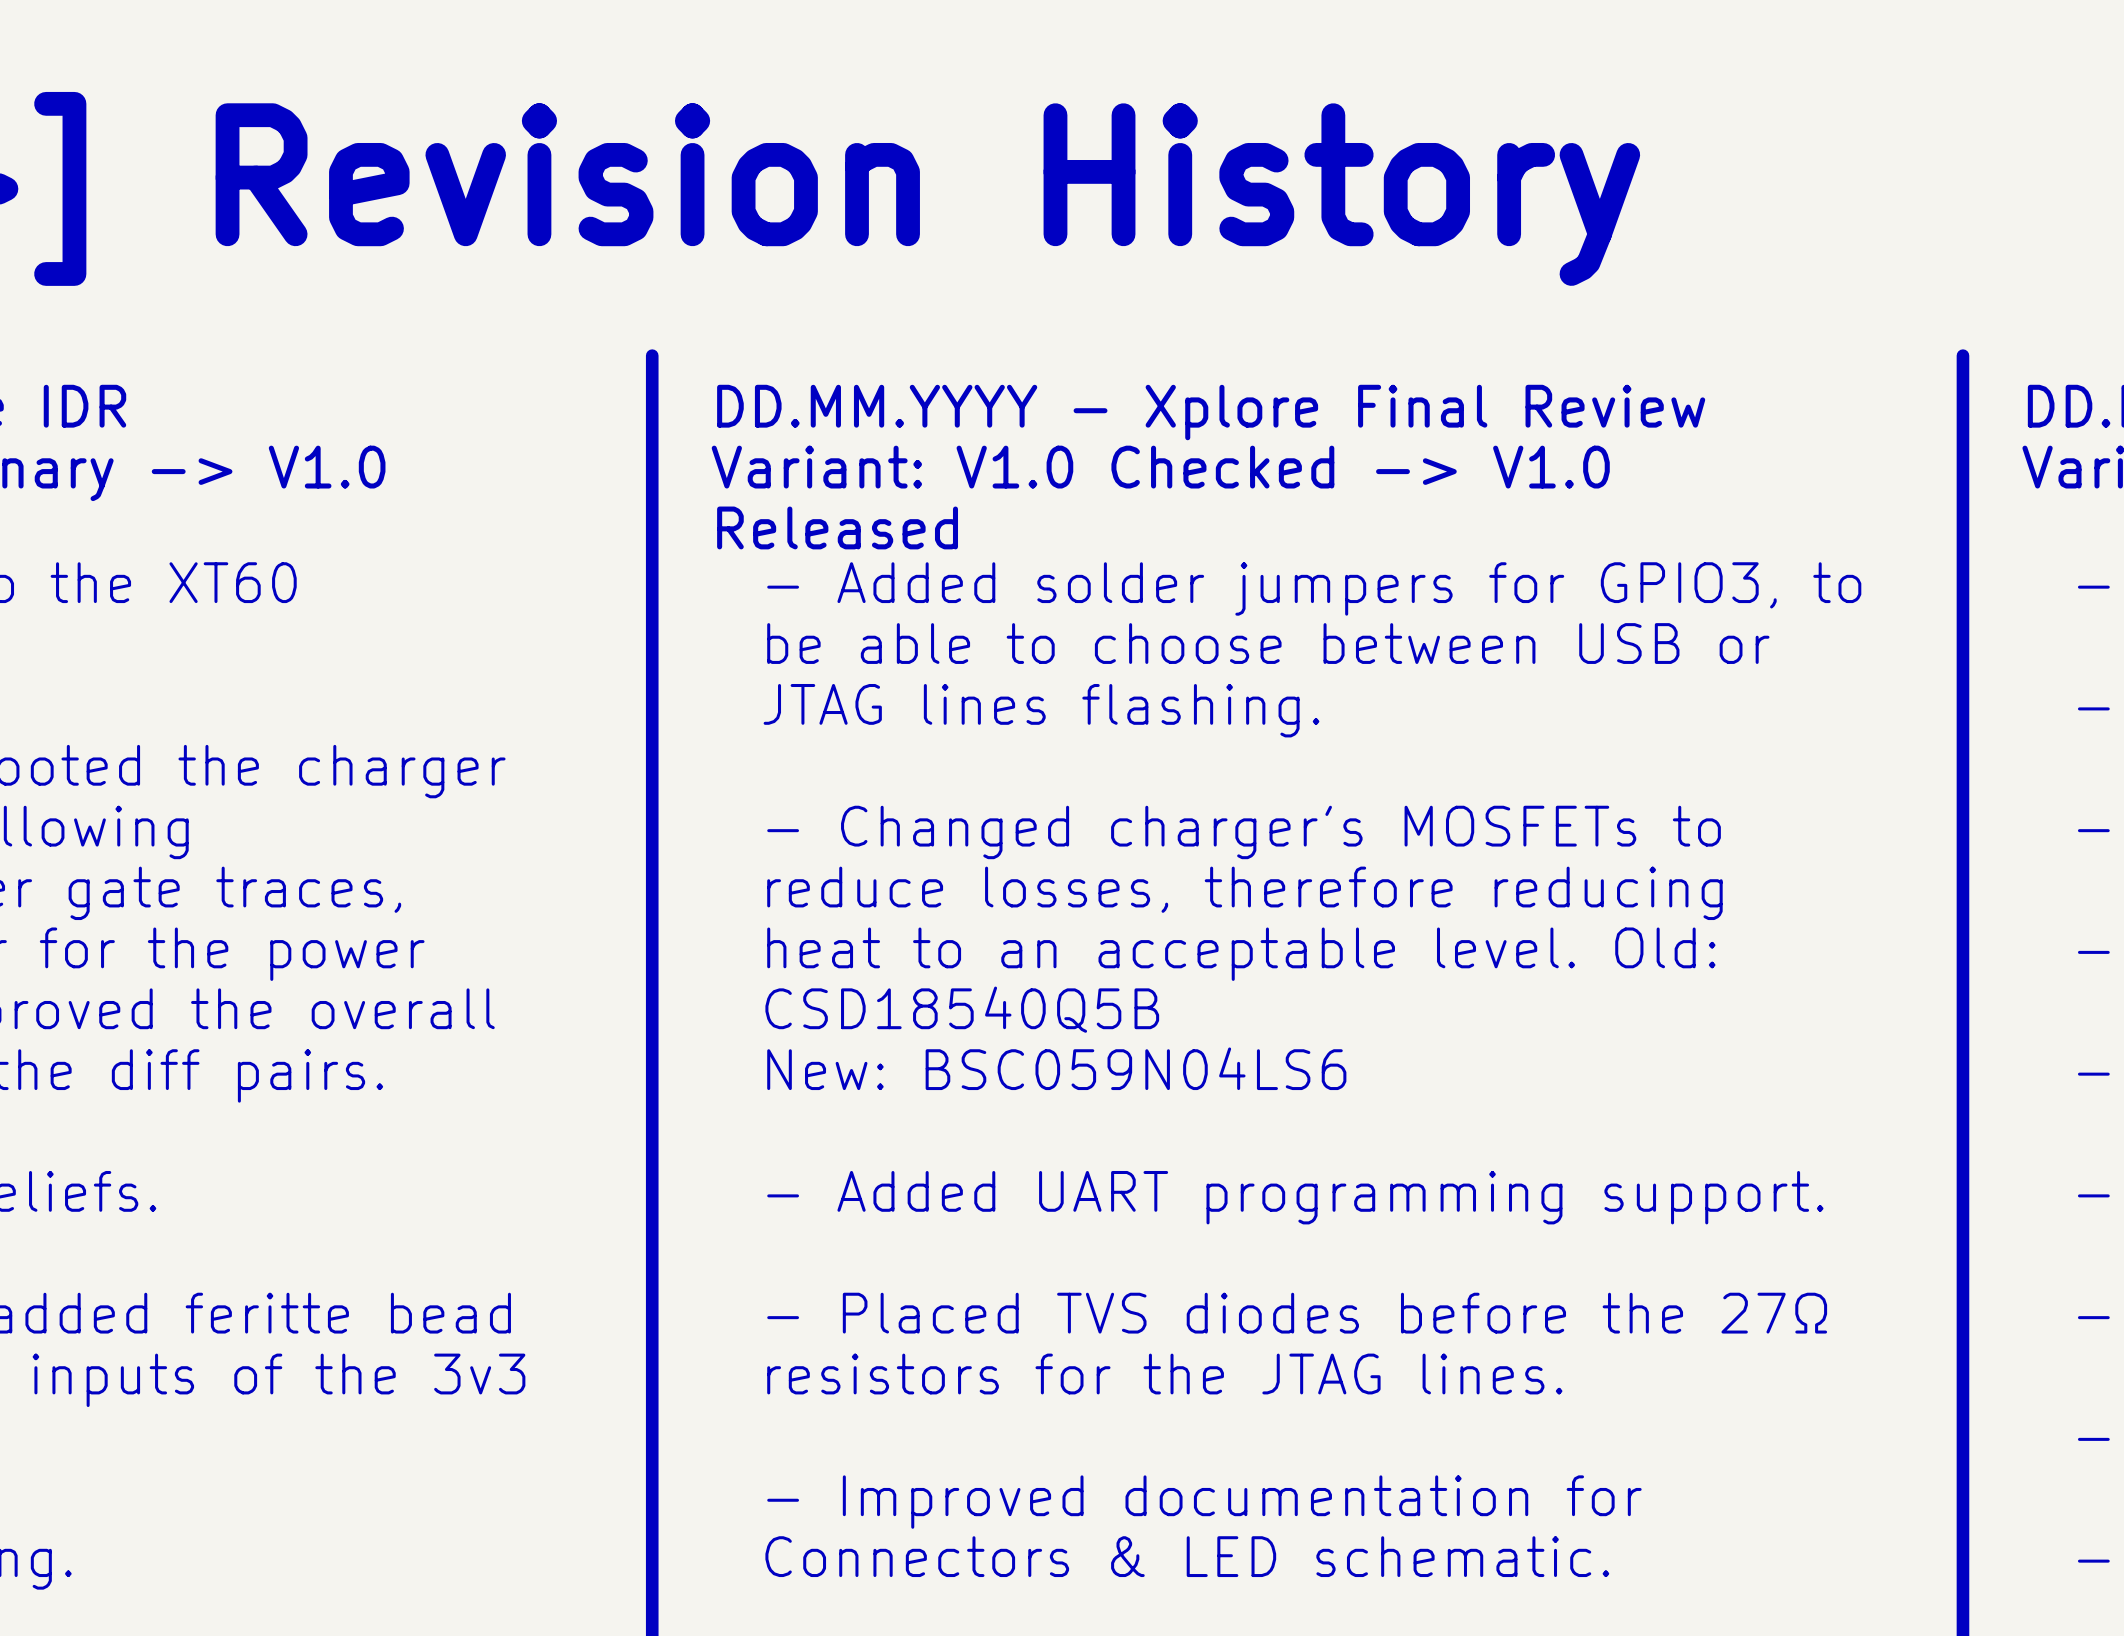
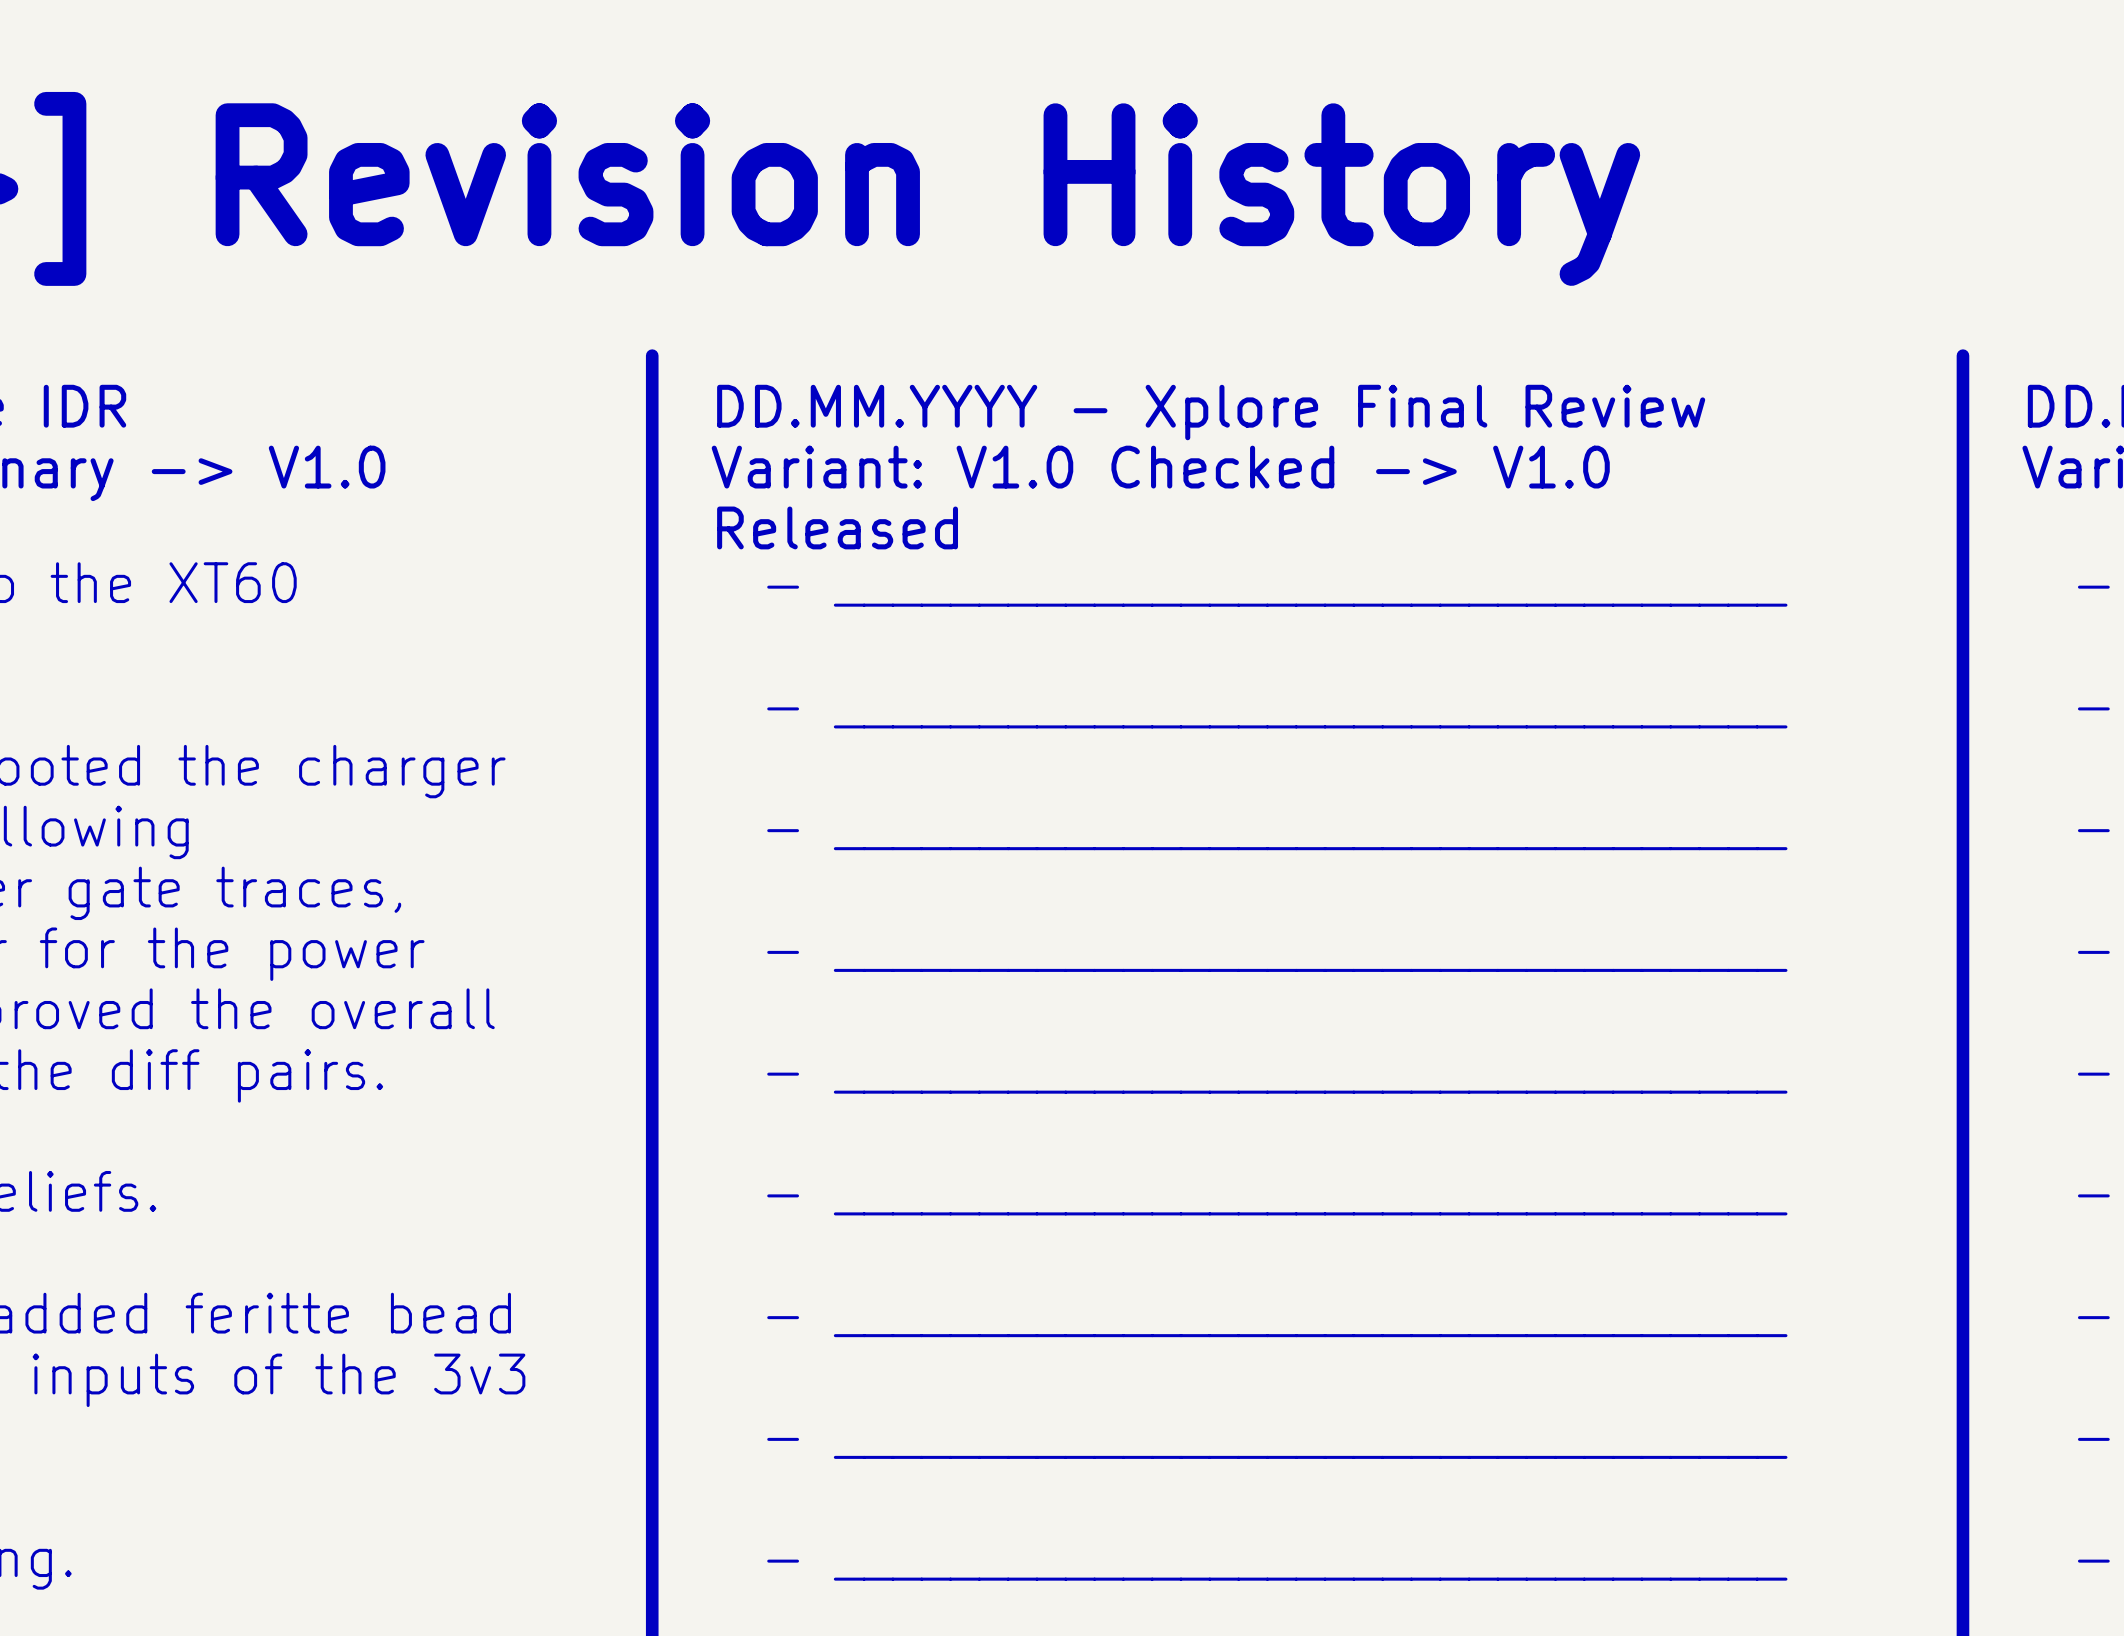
text: - Added solder jumpers for GPIO3, to (1314, 588) -> - _________________________________ (1277, 596)
text: be able to choose between USB or (1268, 643) -> none
text: JTAG lines flashing. (1041, 710) -> - _________________________________ (1277, 717)
text: - Changed charger's MOSFETs to (1244, 832) -> - _________________________________ (1277, 839)
text: reduce losses, therefore reducing (1244, 893) -> none
text: heat to an acceptable level. Old: (1241, 954) -> - _________________________________ (1277, 961)
text: CSD18540Q5B (962, 1009) -> none
text: New: BSC059N04LS6 (1056, 1068) -> - _________________________________ (1277, 1083)
text: - Added UART programming support. (1295, 1197) -> - _________________________________ (1277, 1204)
text: - Placed TVS diodes before the 27Ω (1297, 1313) -> - _________________________________ (1277, 1326)
text: resistors for the JTAG lines. (1164, 1374) -> none
text: none -> - _________________________________ (1277, 1448)
text: - Improved documentation for (1204, 1502) -> none
text: Connectors & LED schematic. (1187, 1556) -> - _________________________________ (1277, 1570)

